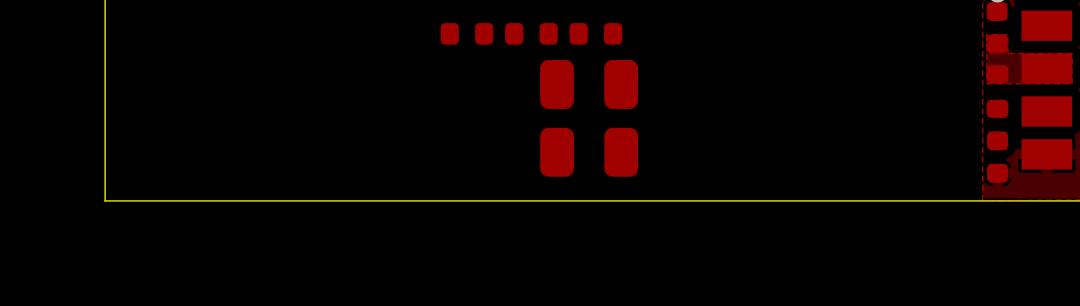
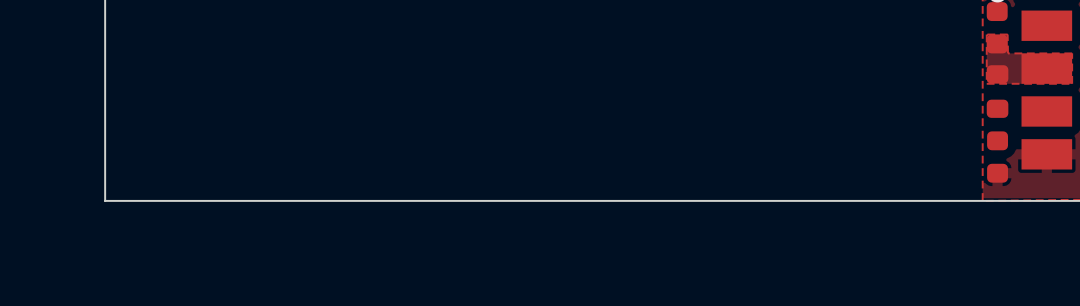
part: (466, 33) -> none
part: (531, 33) -> none
part: (595, 33) -> none
part: (589, 84) -> none
part: (589, 152) -> none

